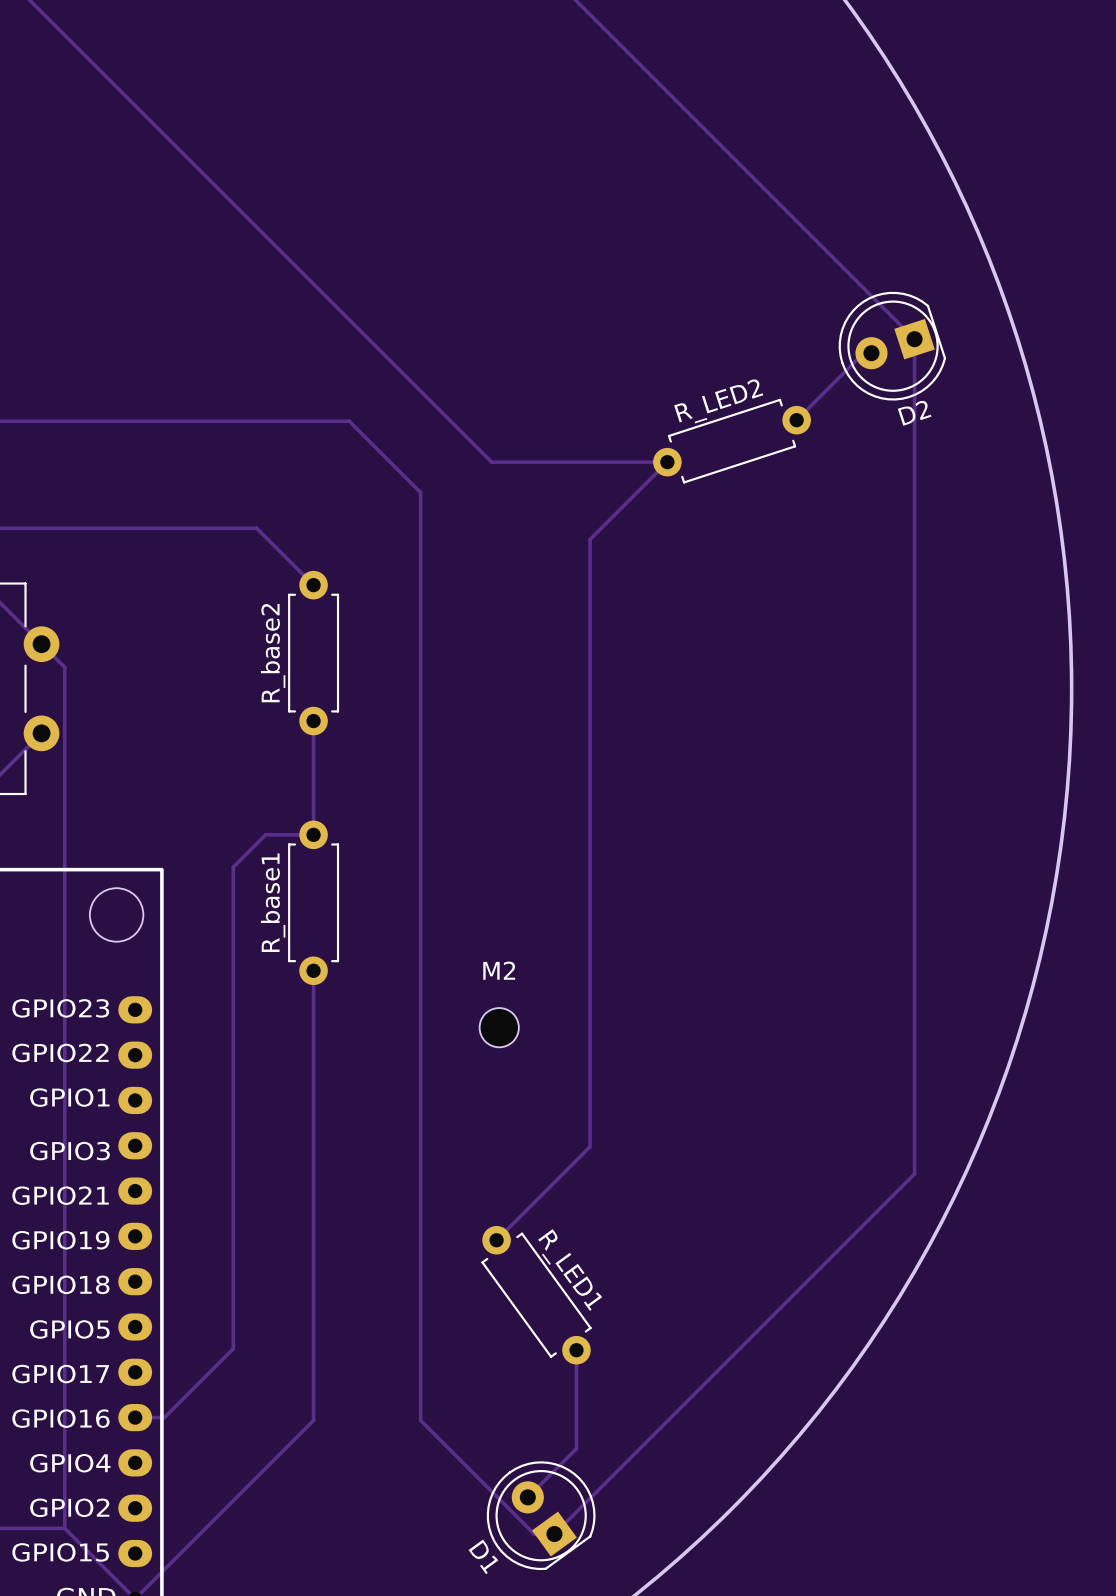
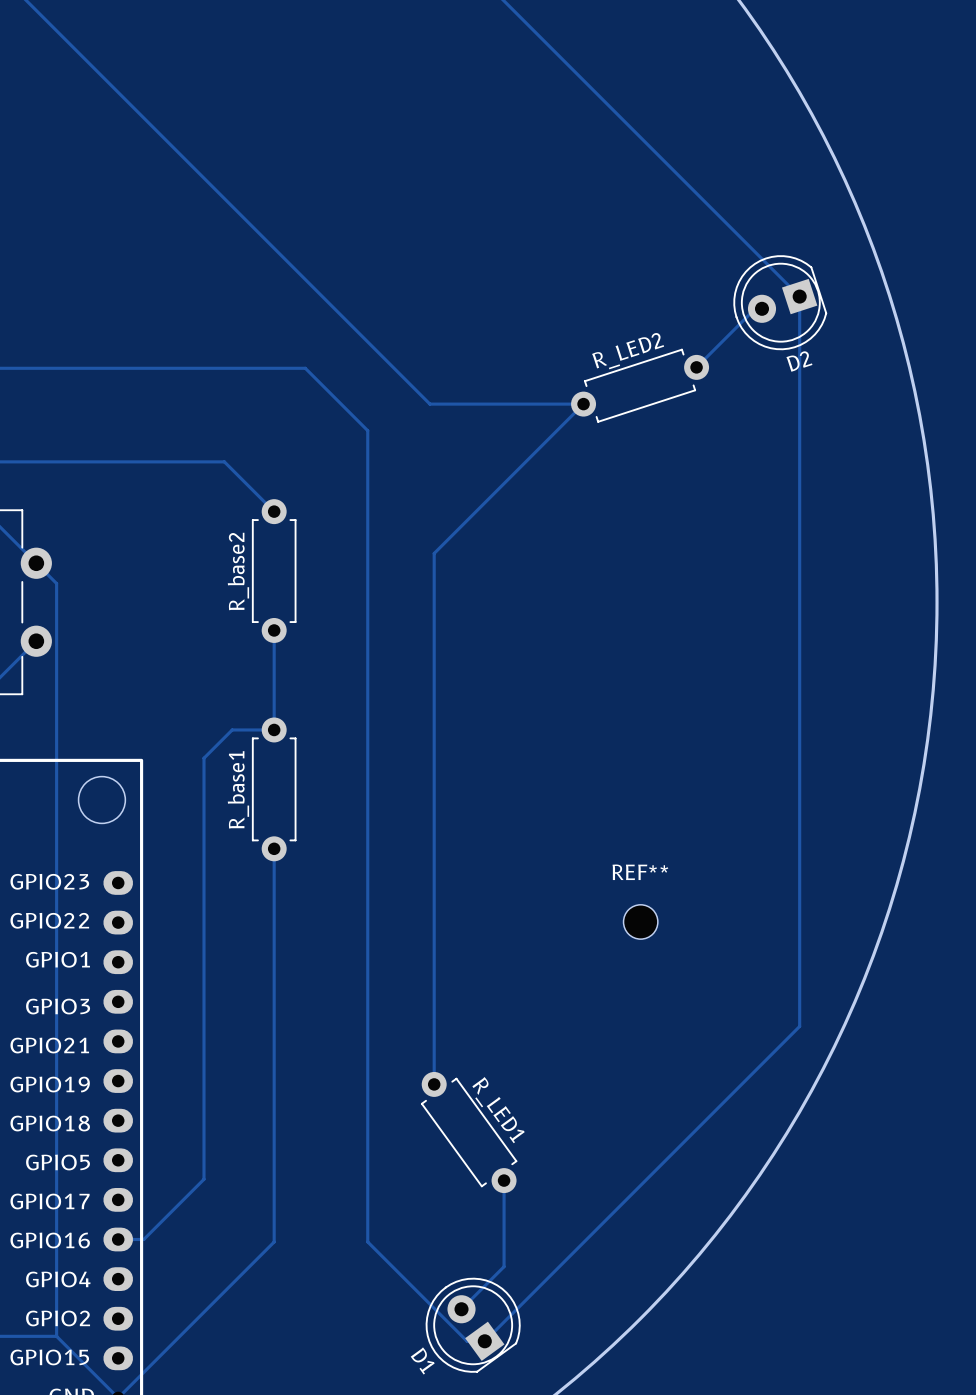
track: (590, 539) (590, 1146) (496, 1240) -> (515, 471) (434, 553) (434, 1084)
M2: (499, 1027) -> none
REF**: none -> (640, 921)

